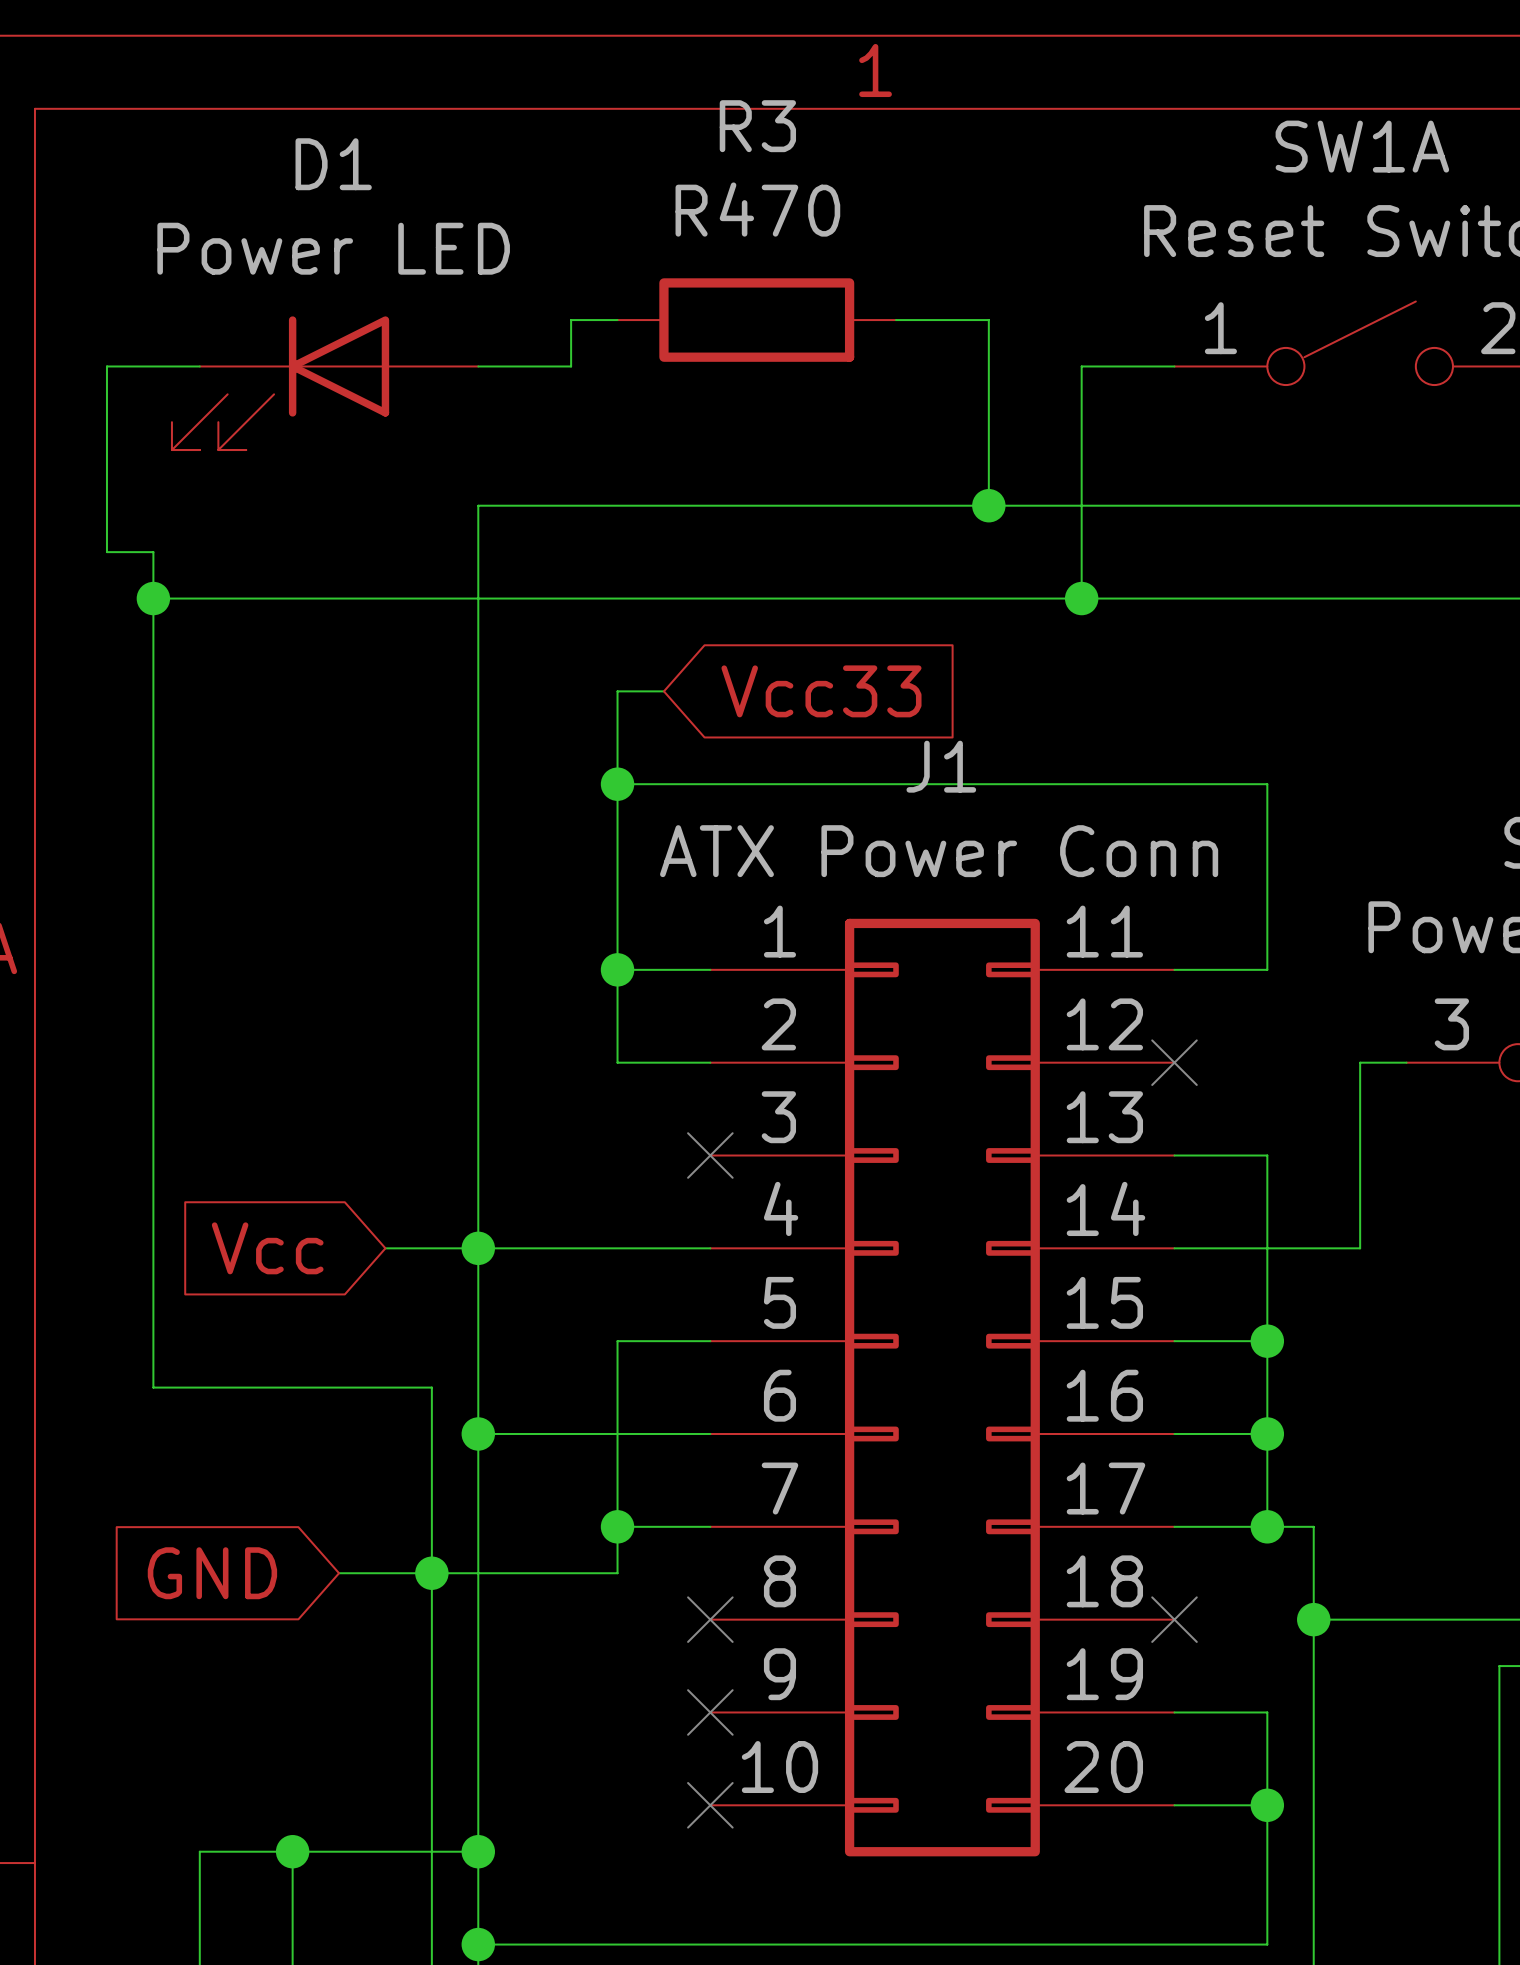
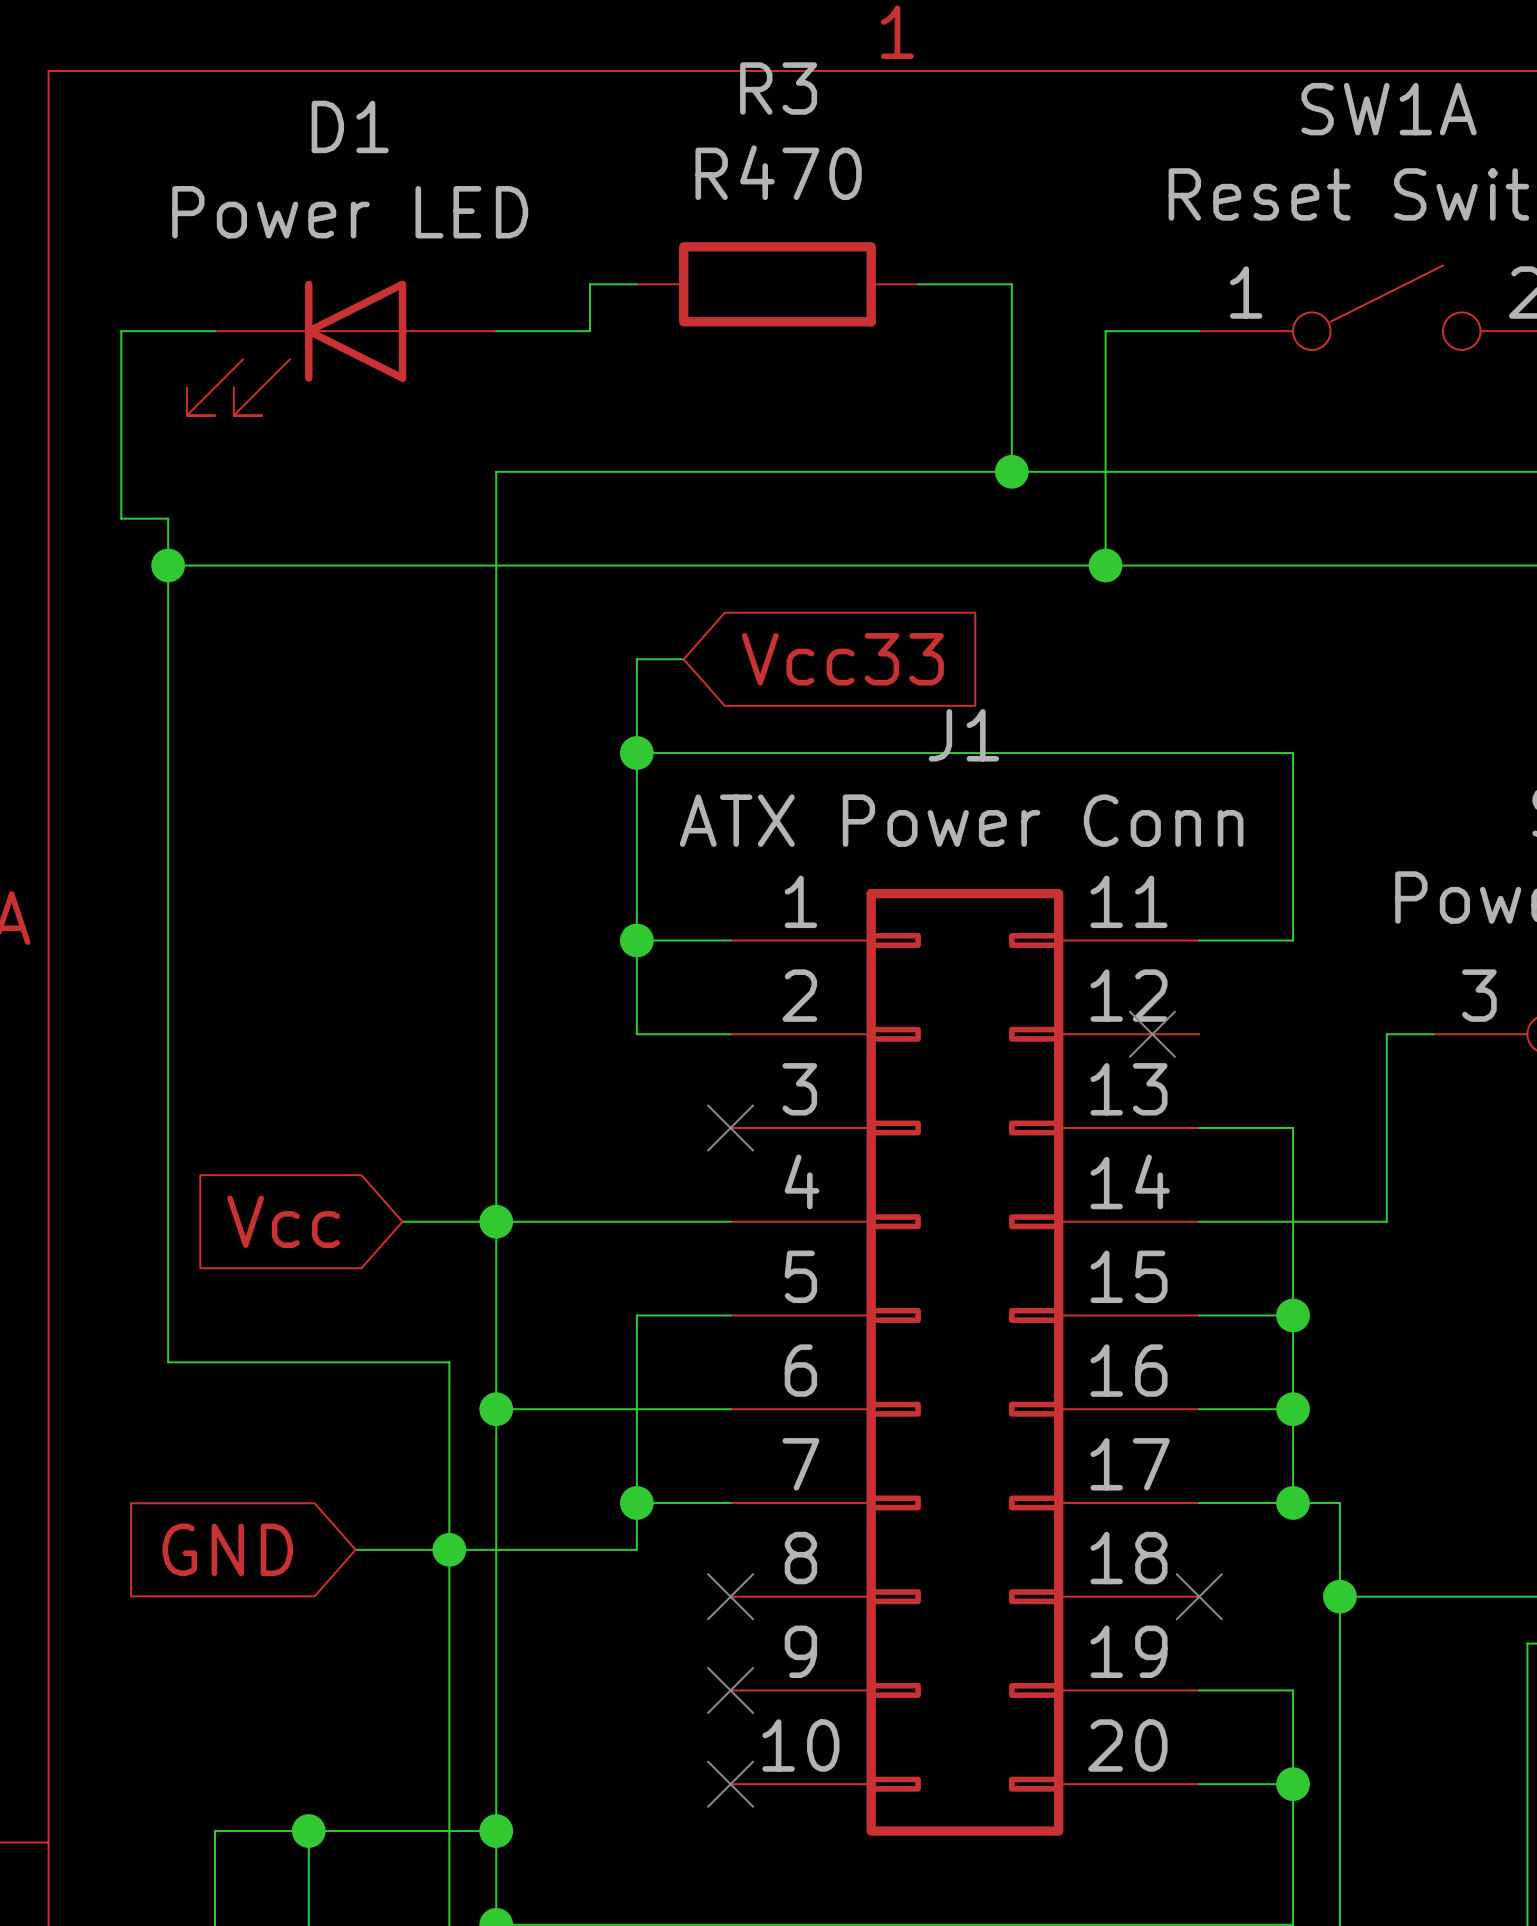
no-connect mark position: (1174, 1062) -> (1152, 1034)

